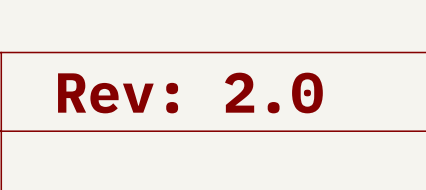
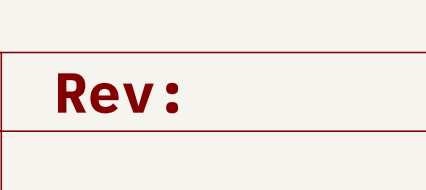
title block: Rev: 2.0 (190, 93) -> Rev: (118, 93)

